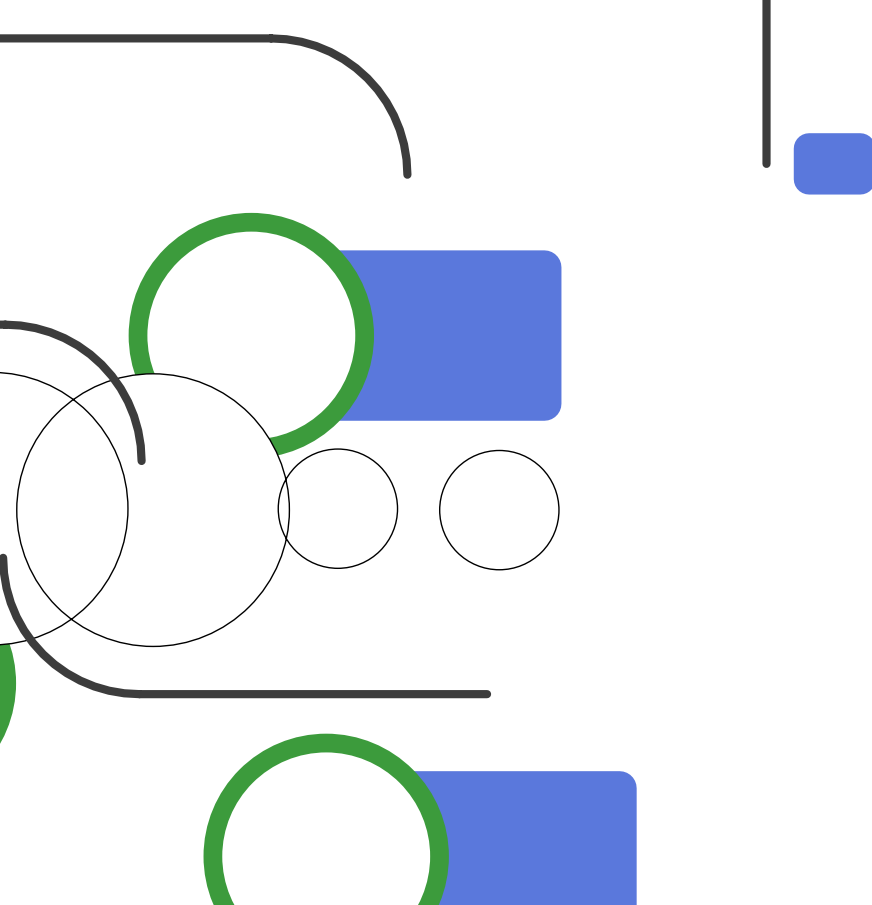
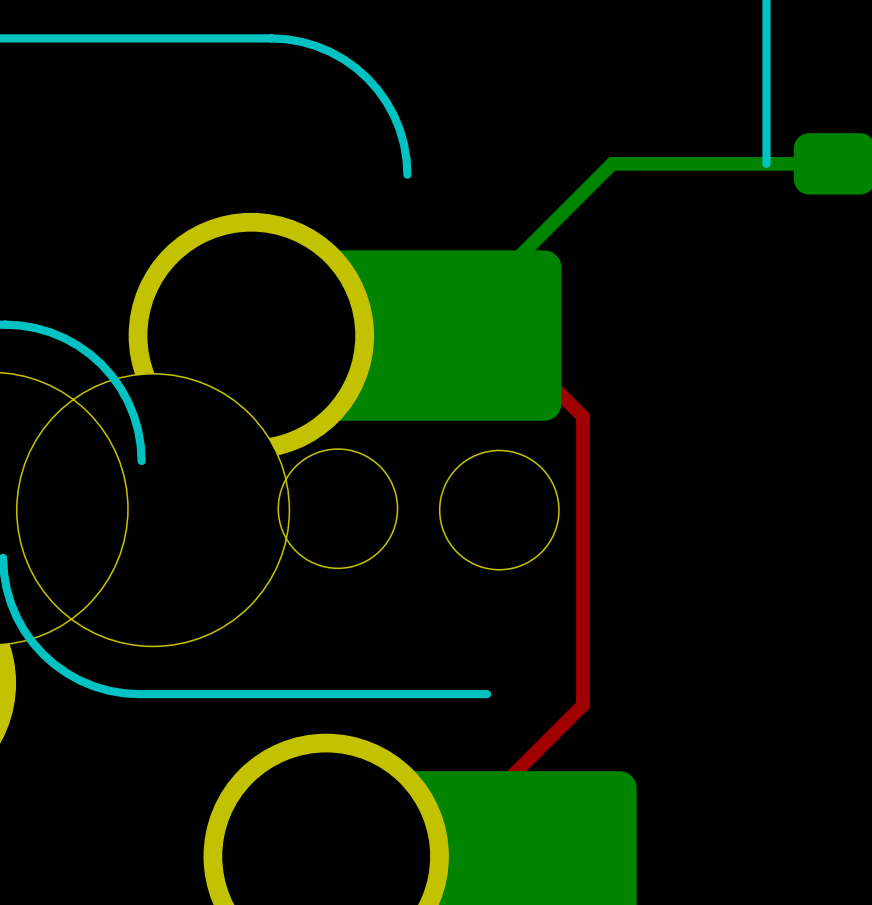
bottom track: none -> (834, 163) (612, 163) (440, 335)
top track: none -> (251, 335) (501, 335) (582, 416) (582, 705) (431, 856)

